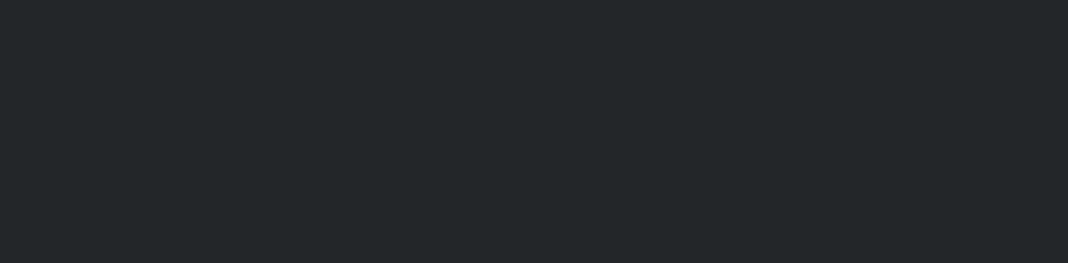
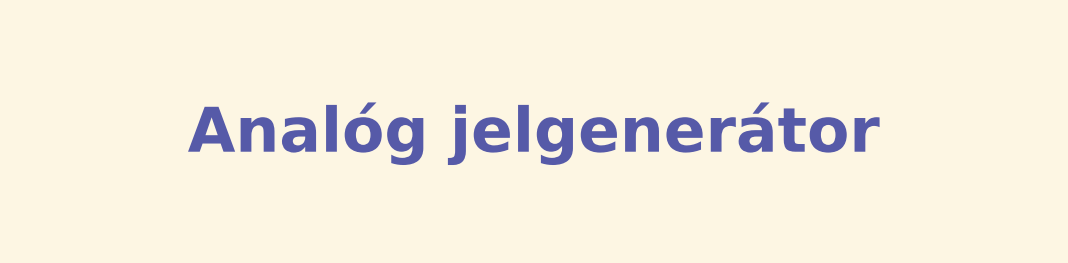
text: none -> Analóg jelgenerátor (533, 133)

